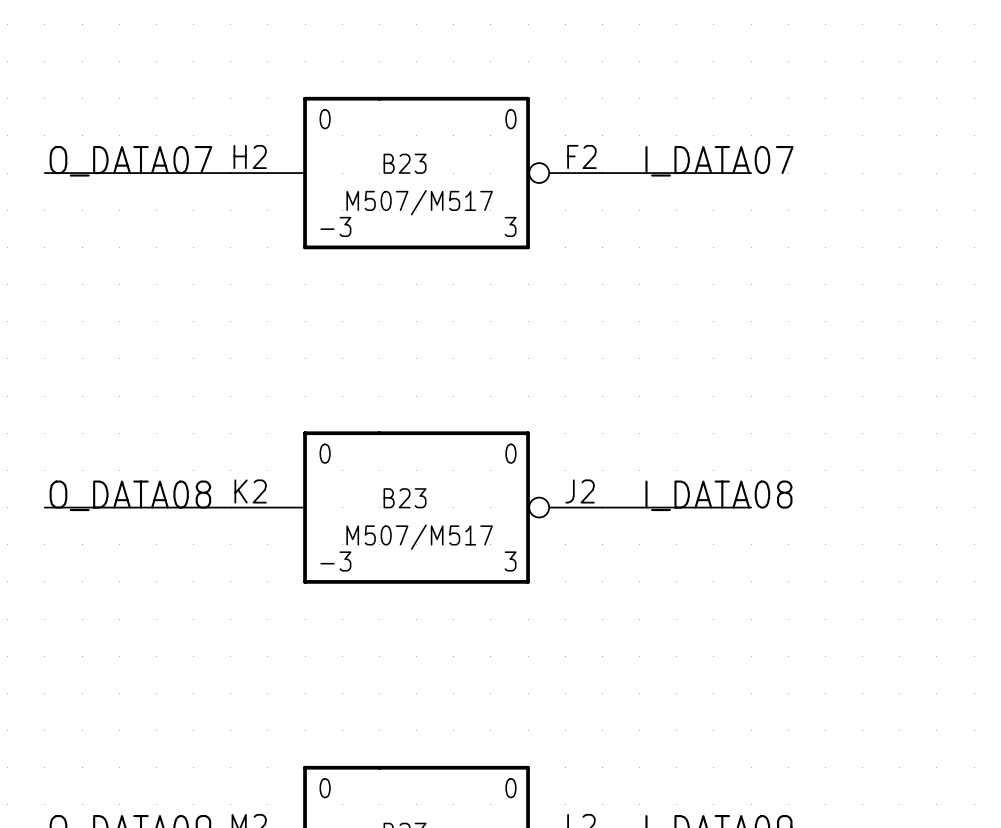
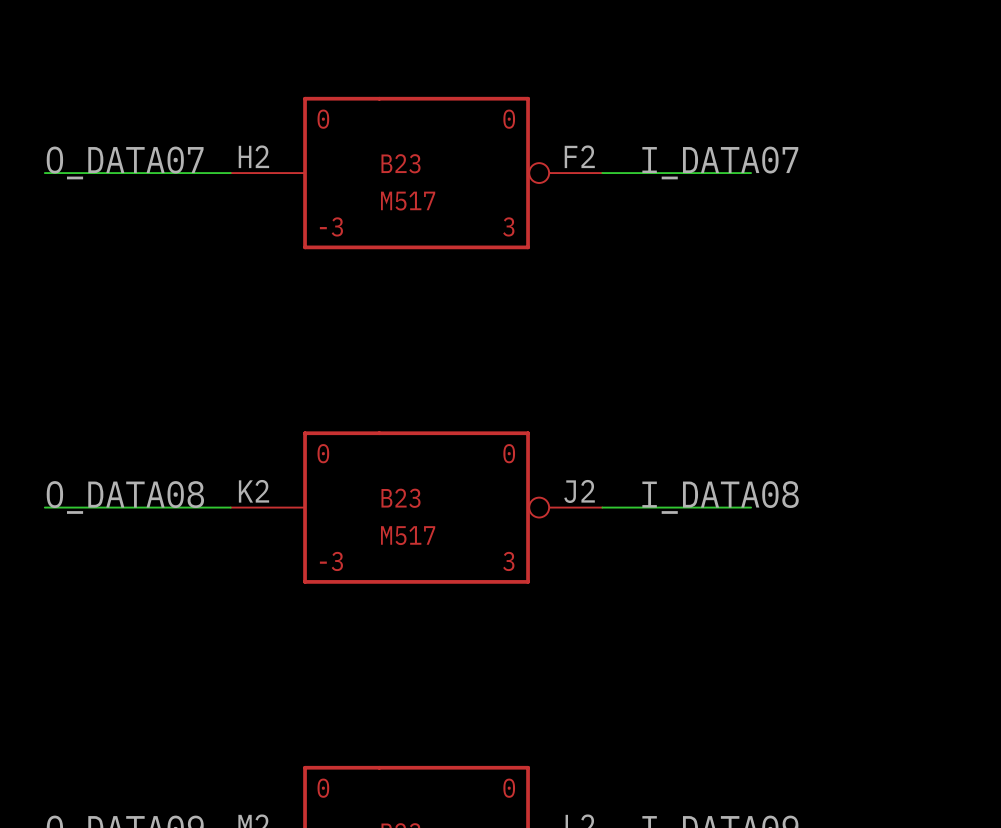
B23 value: none -> M517 (408, 201)
B23 text: M507/M517 (419, 202) -> none
B23 value: none -> M517 (408, 535)
B23 text: M507/M517 (419, 537) -> none

